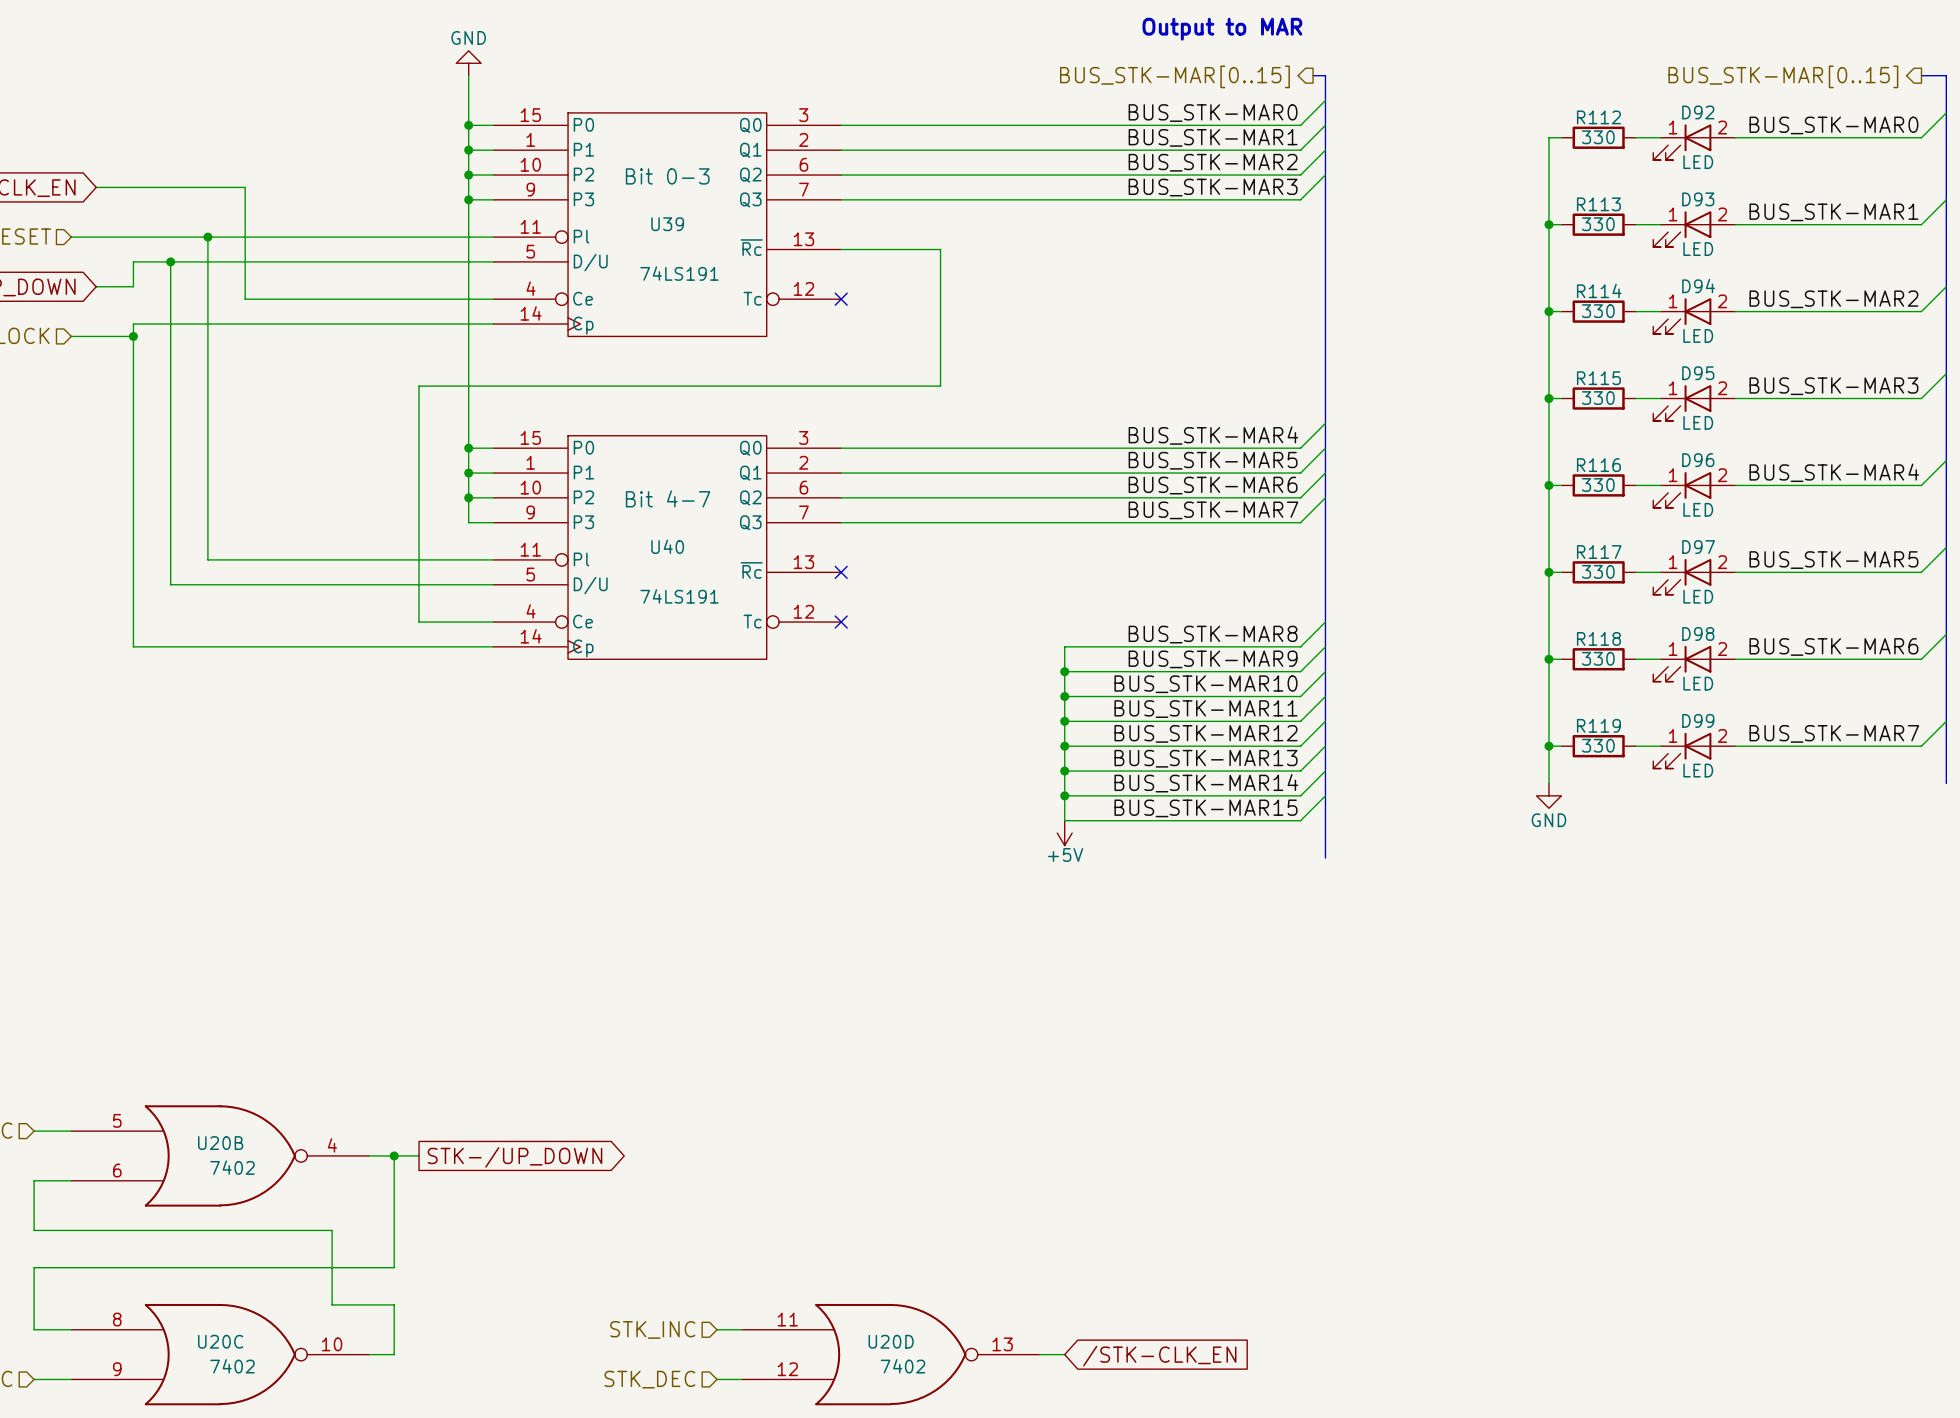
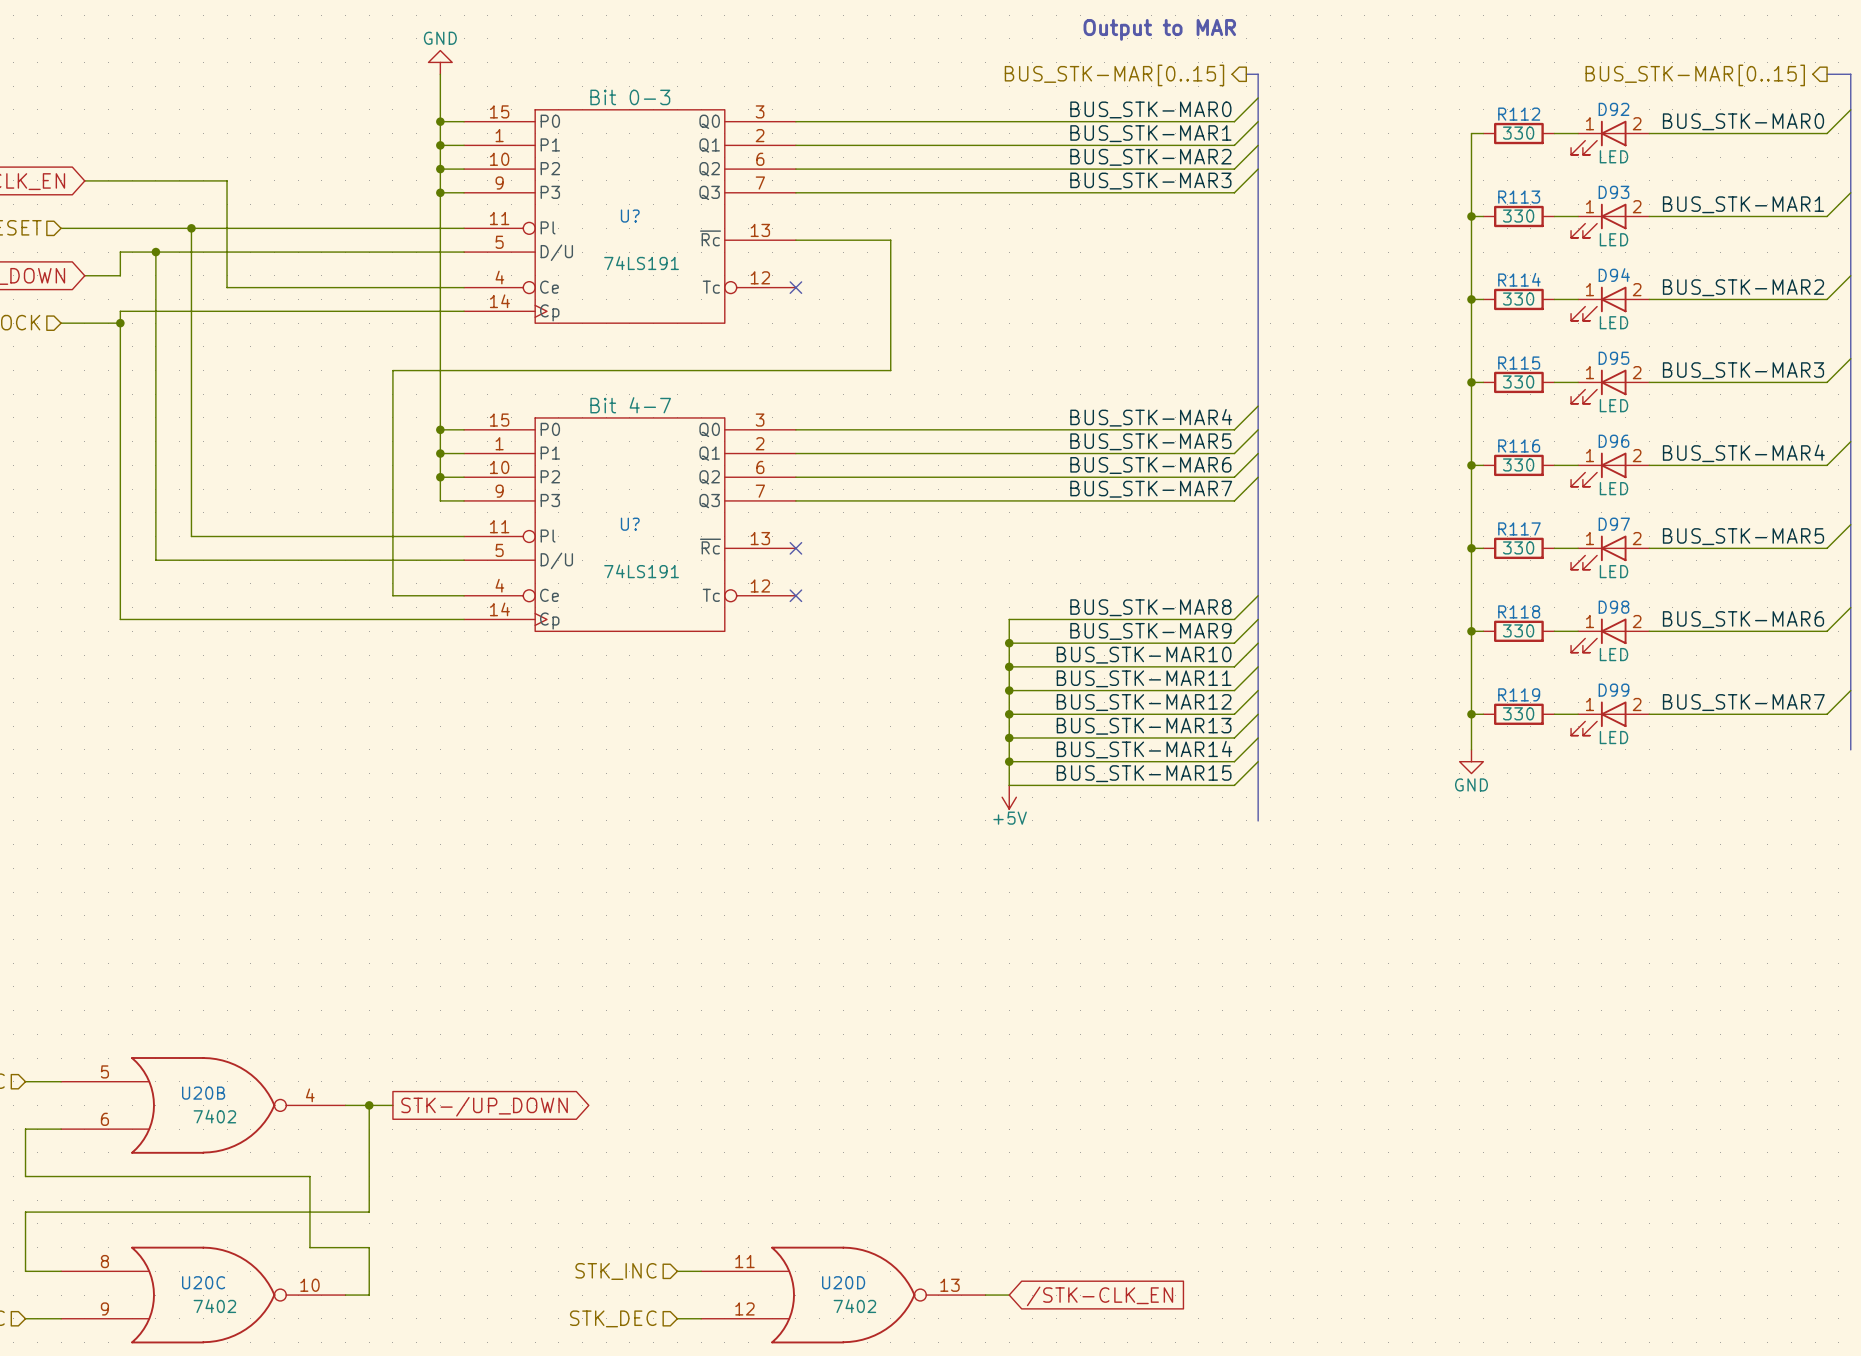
U39 text position: Bit 0-3 (667, 176) -> Bit 0-3 (630, 97)
U39 name: U39 (667, 224) -> U? (630, 216)
U40 text position: Bit 4-7 (668, 498) -> Bit 4-7 (630, 405)
U40 name: U40 (667, 546) -> U? (630, 524)

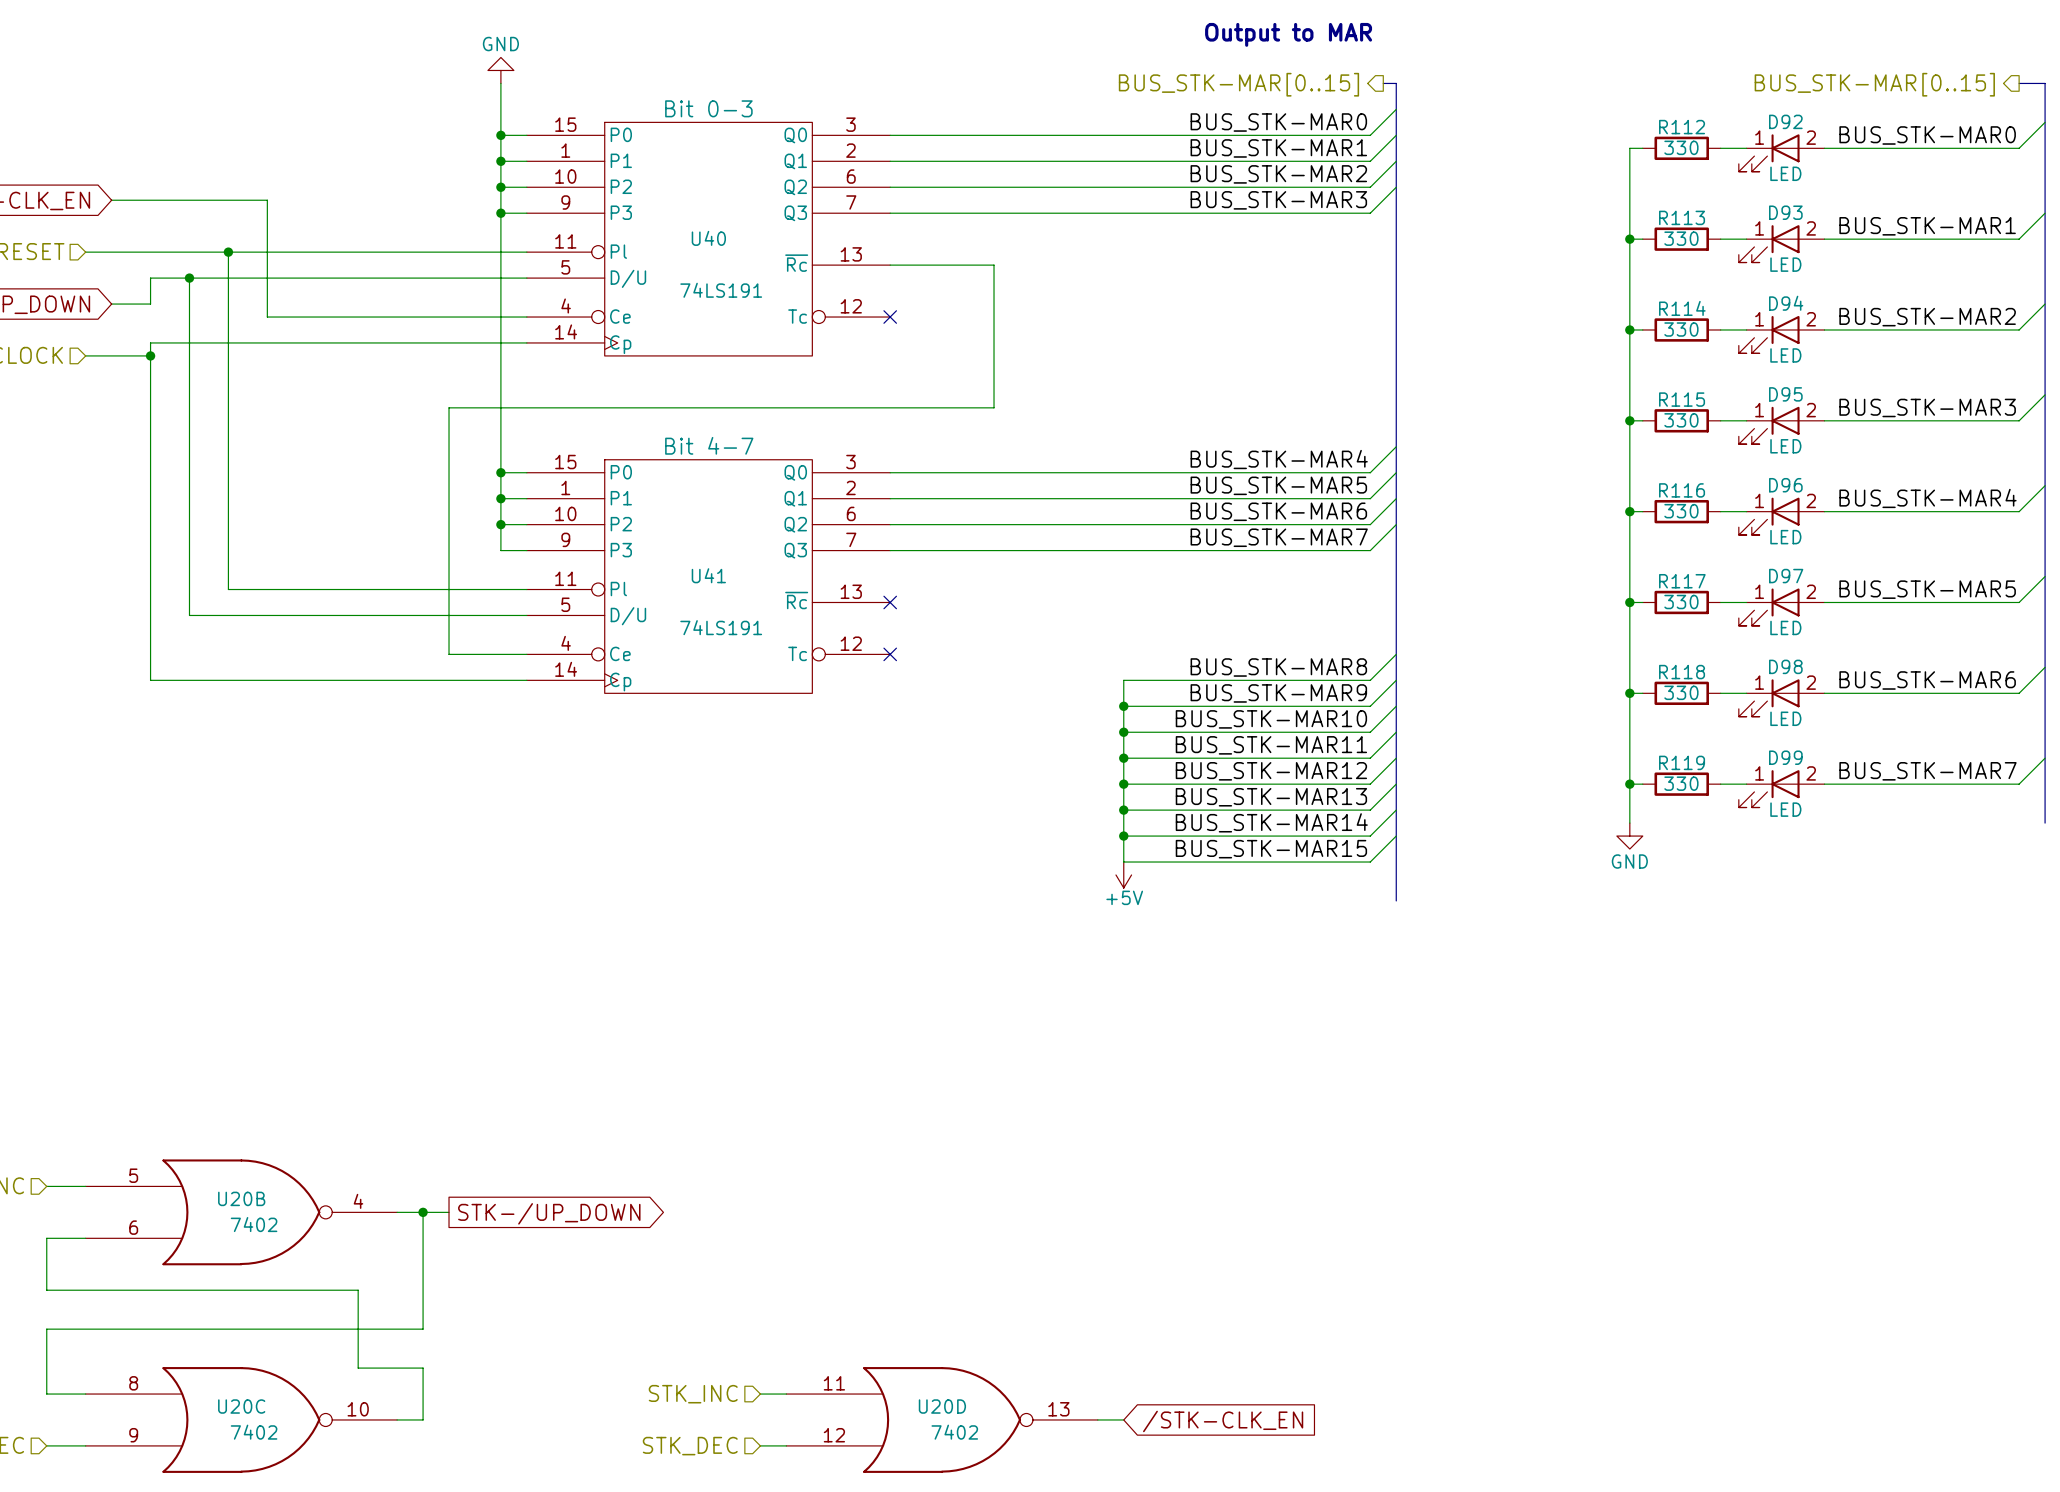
U? name: U? (630, 216) -> U40 (708, 238)
U? name: U? (630, 524) -> U41 (708, 575)

